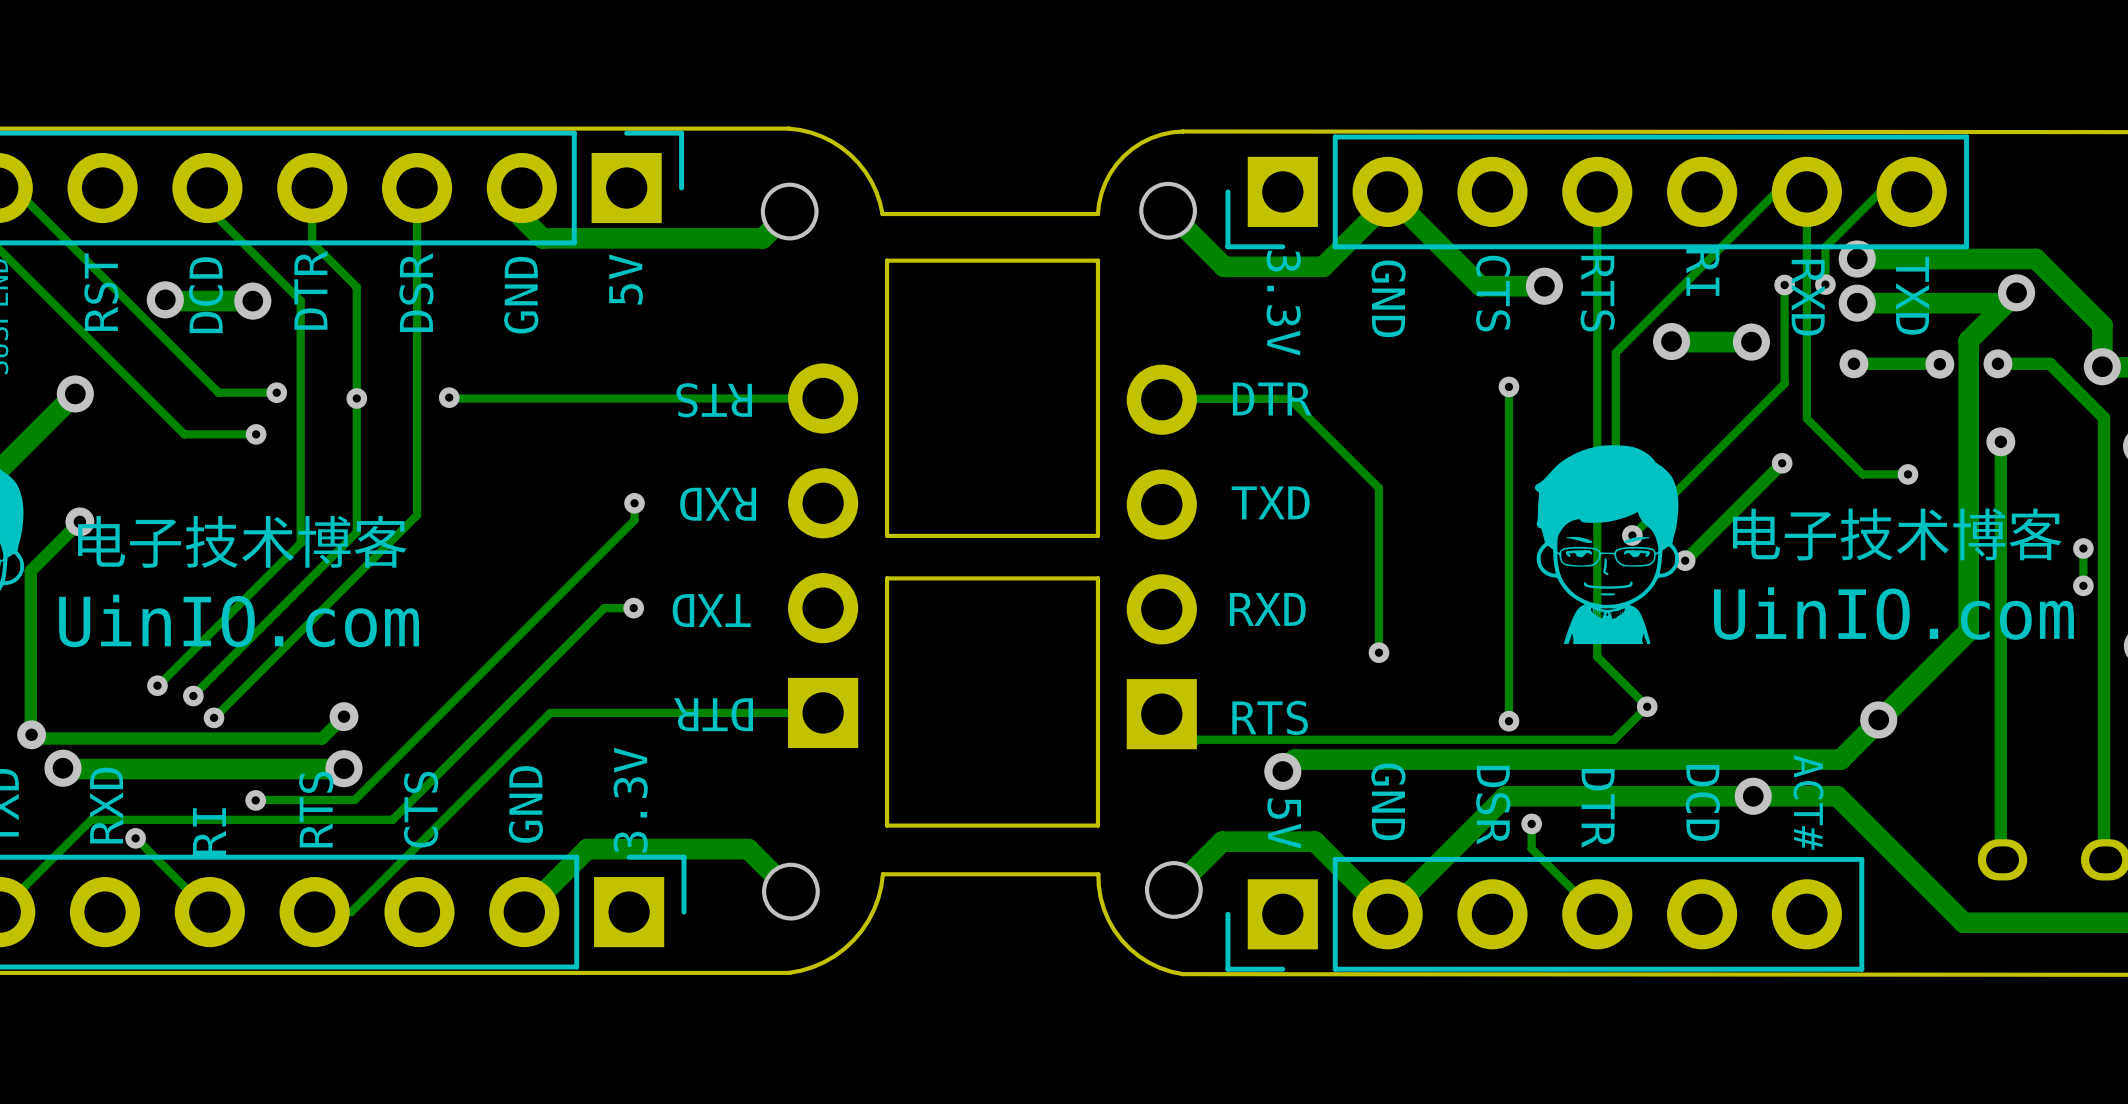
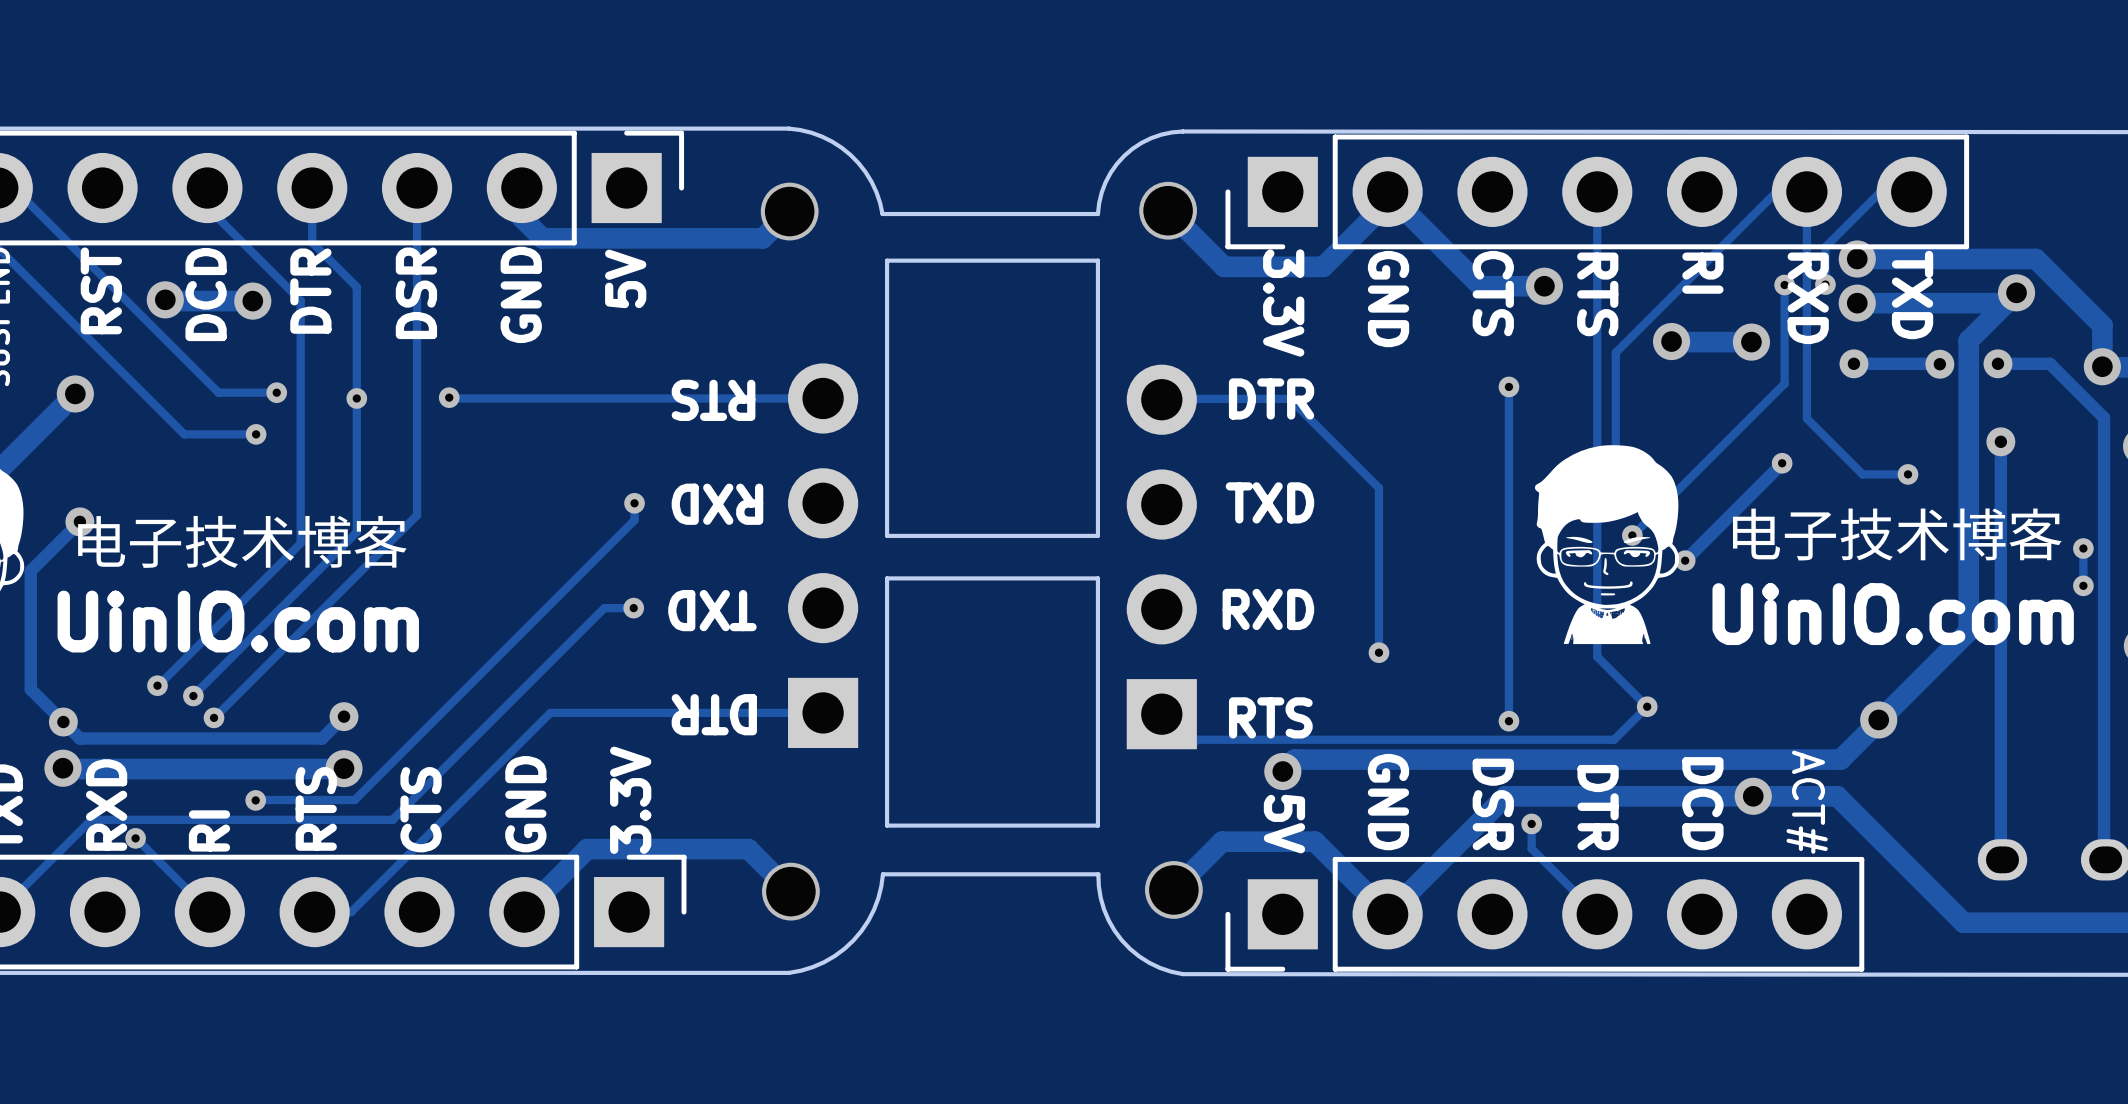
track: (30, 689) (30, 733) (35, 738) (79, 738) -> (30, 689) (79, 738)
via position: (31, 734) -> (63, 722)

